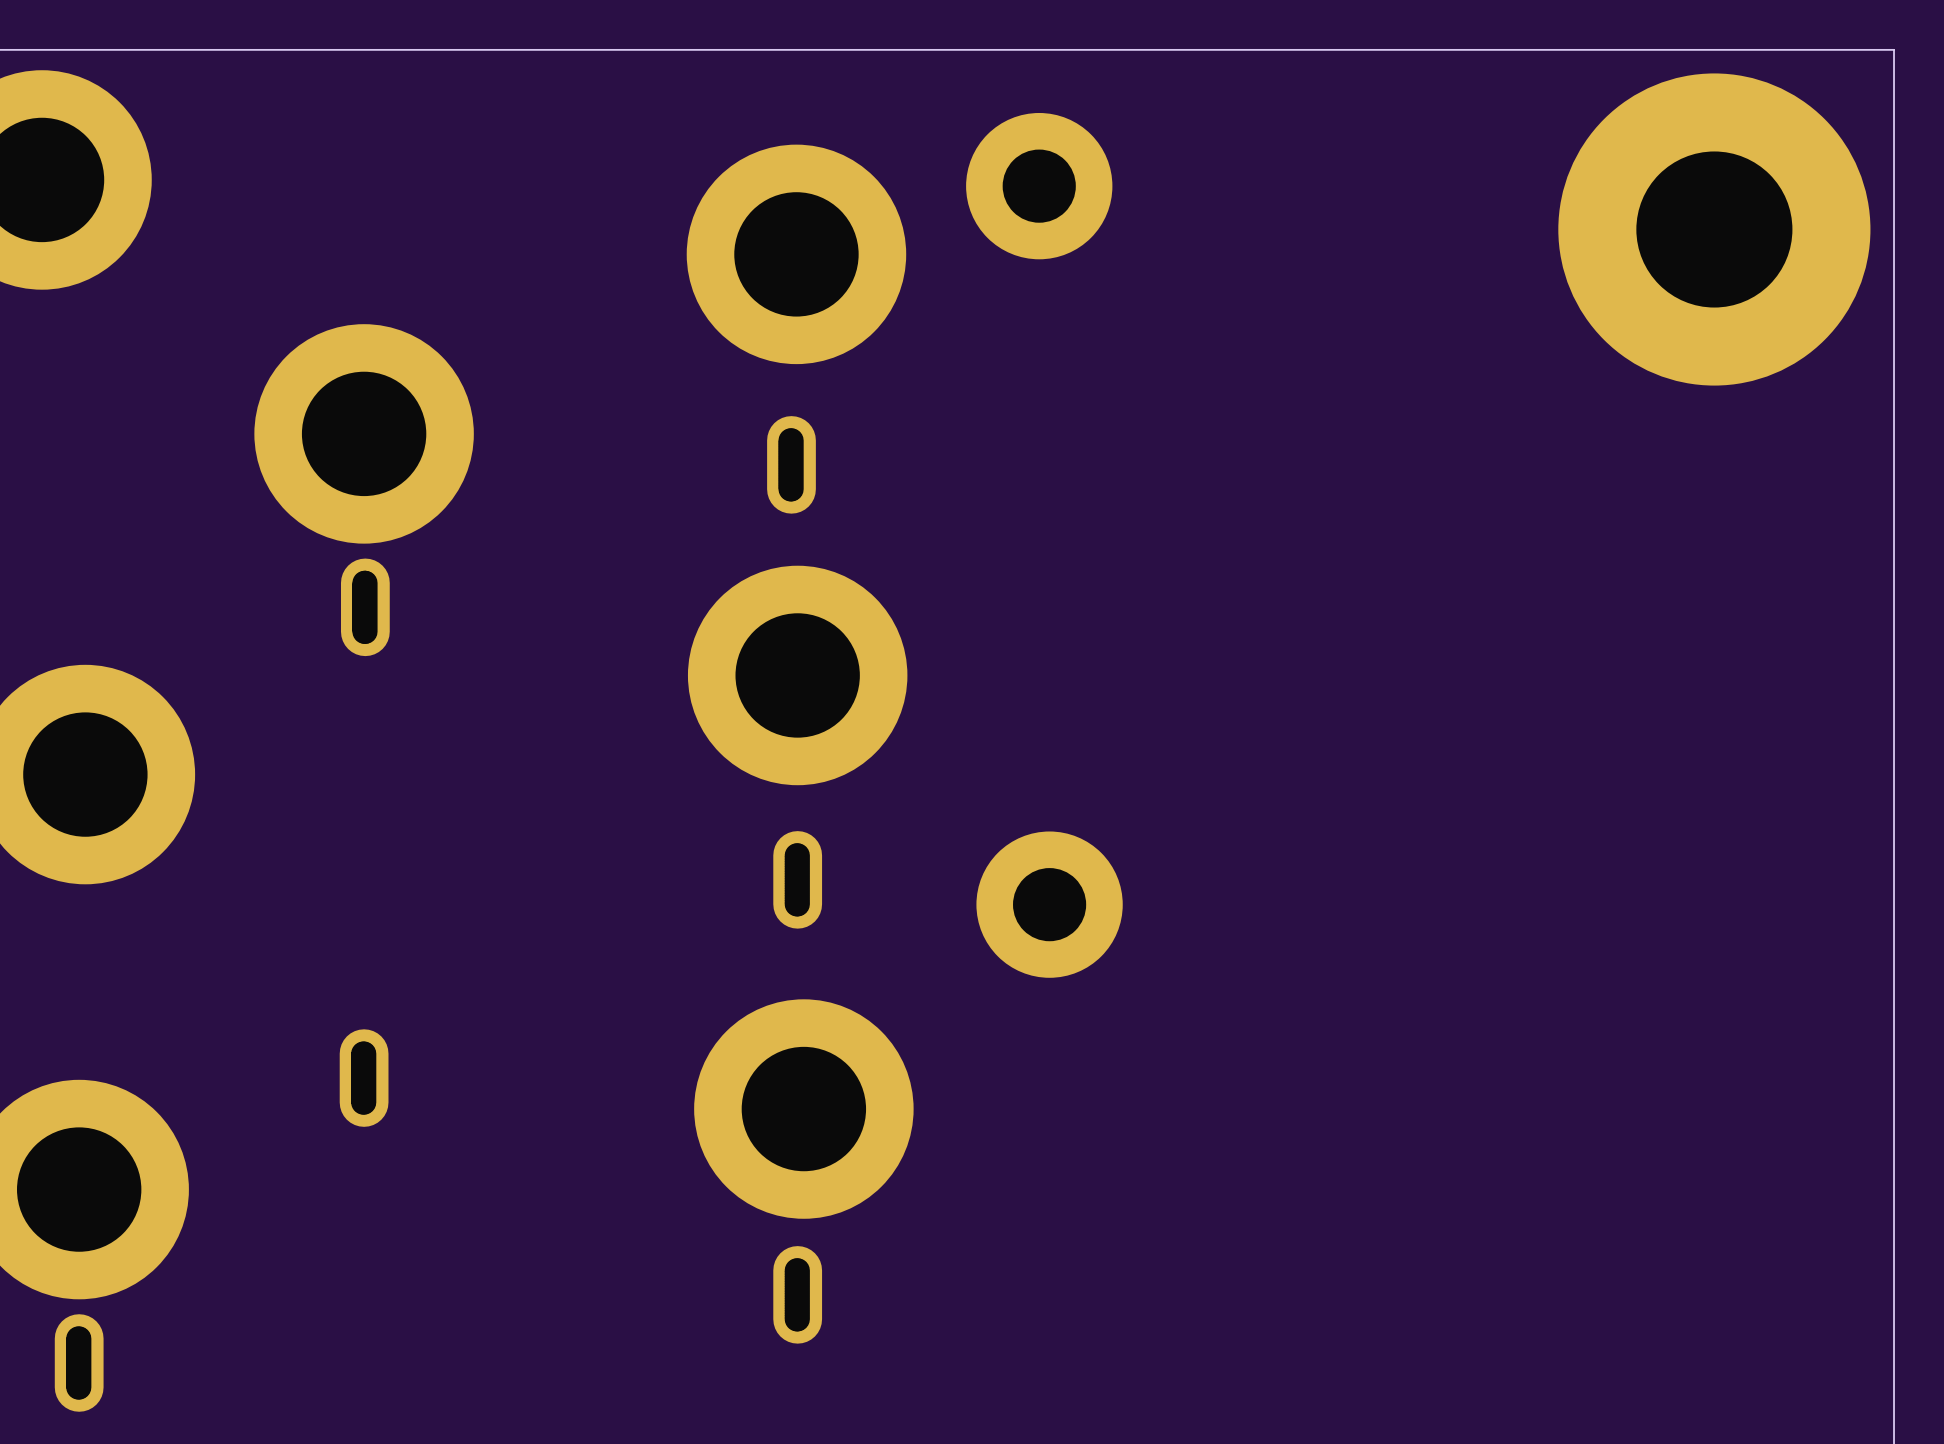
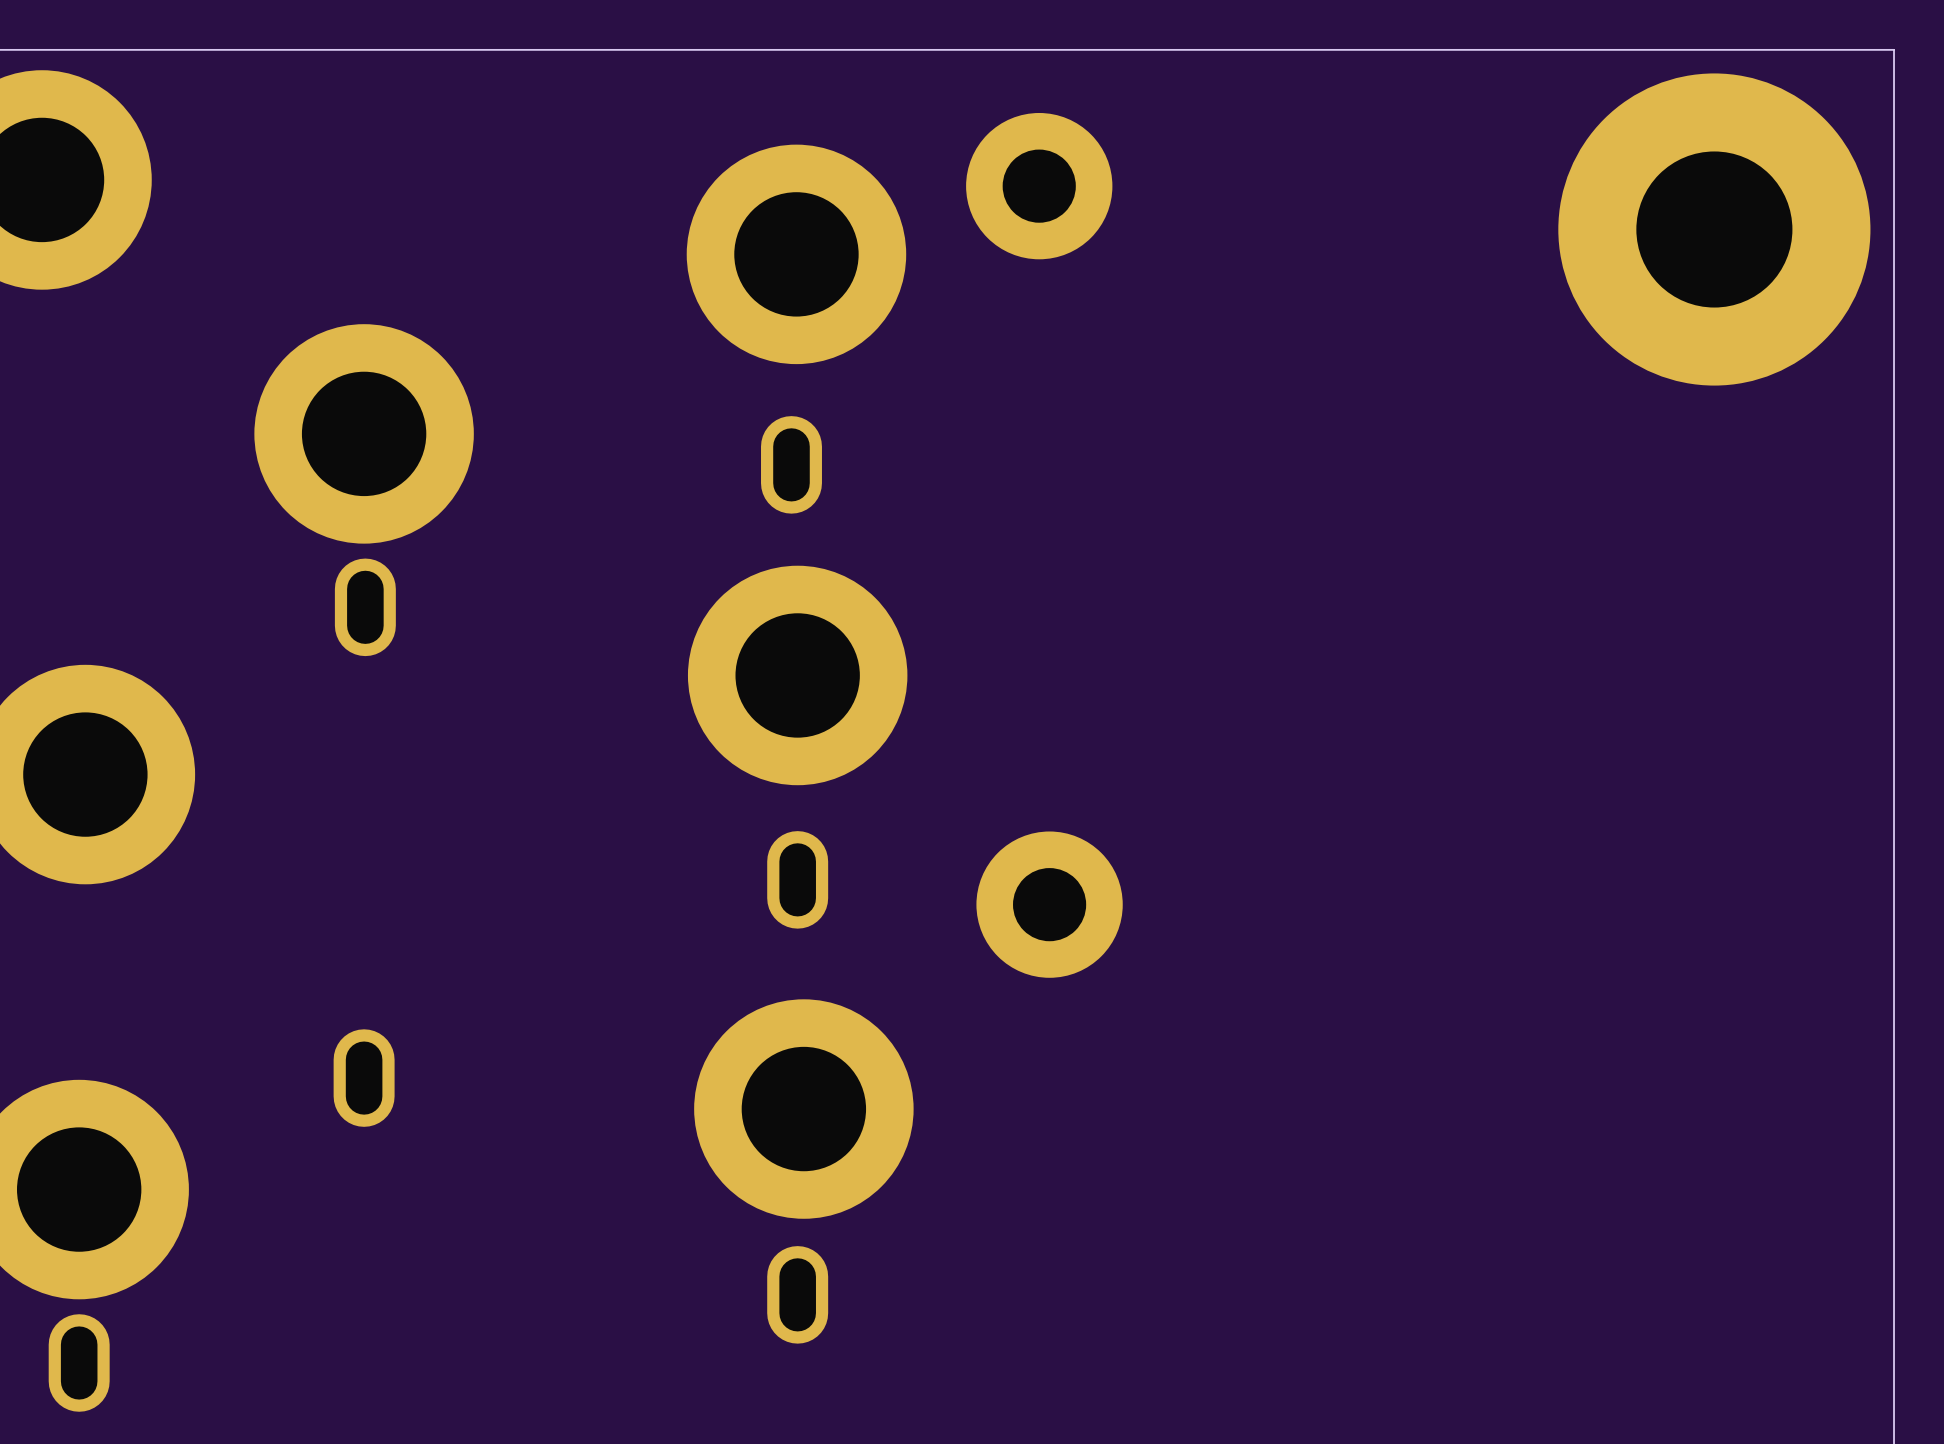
part footprint: [767, 416, 816, 514] -> [761, 416, 822, 514]
part footprint: [340, 558, 390, 657] -> [334, 558, 396, 657]
part footprint: [773, 831, 823, 929] -> [767, 831, 829, 929]
part footprint: [339, 1029, 389, 1127] -> [333, 1029, 395, 1127]
part footprint: [773, 1246, 823, 1344] -> [767, 1246, 829, 1344]
part footprint: [54, 1314, 104, 1412] -> [48, 1314, 110, 1412]

